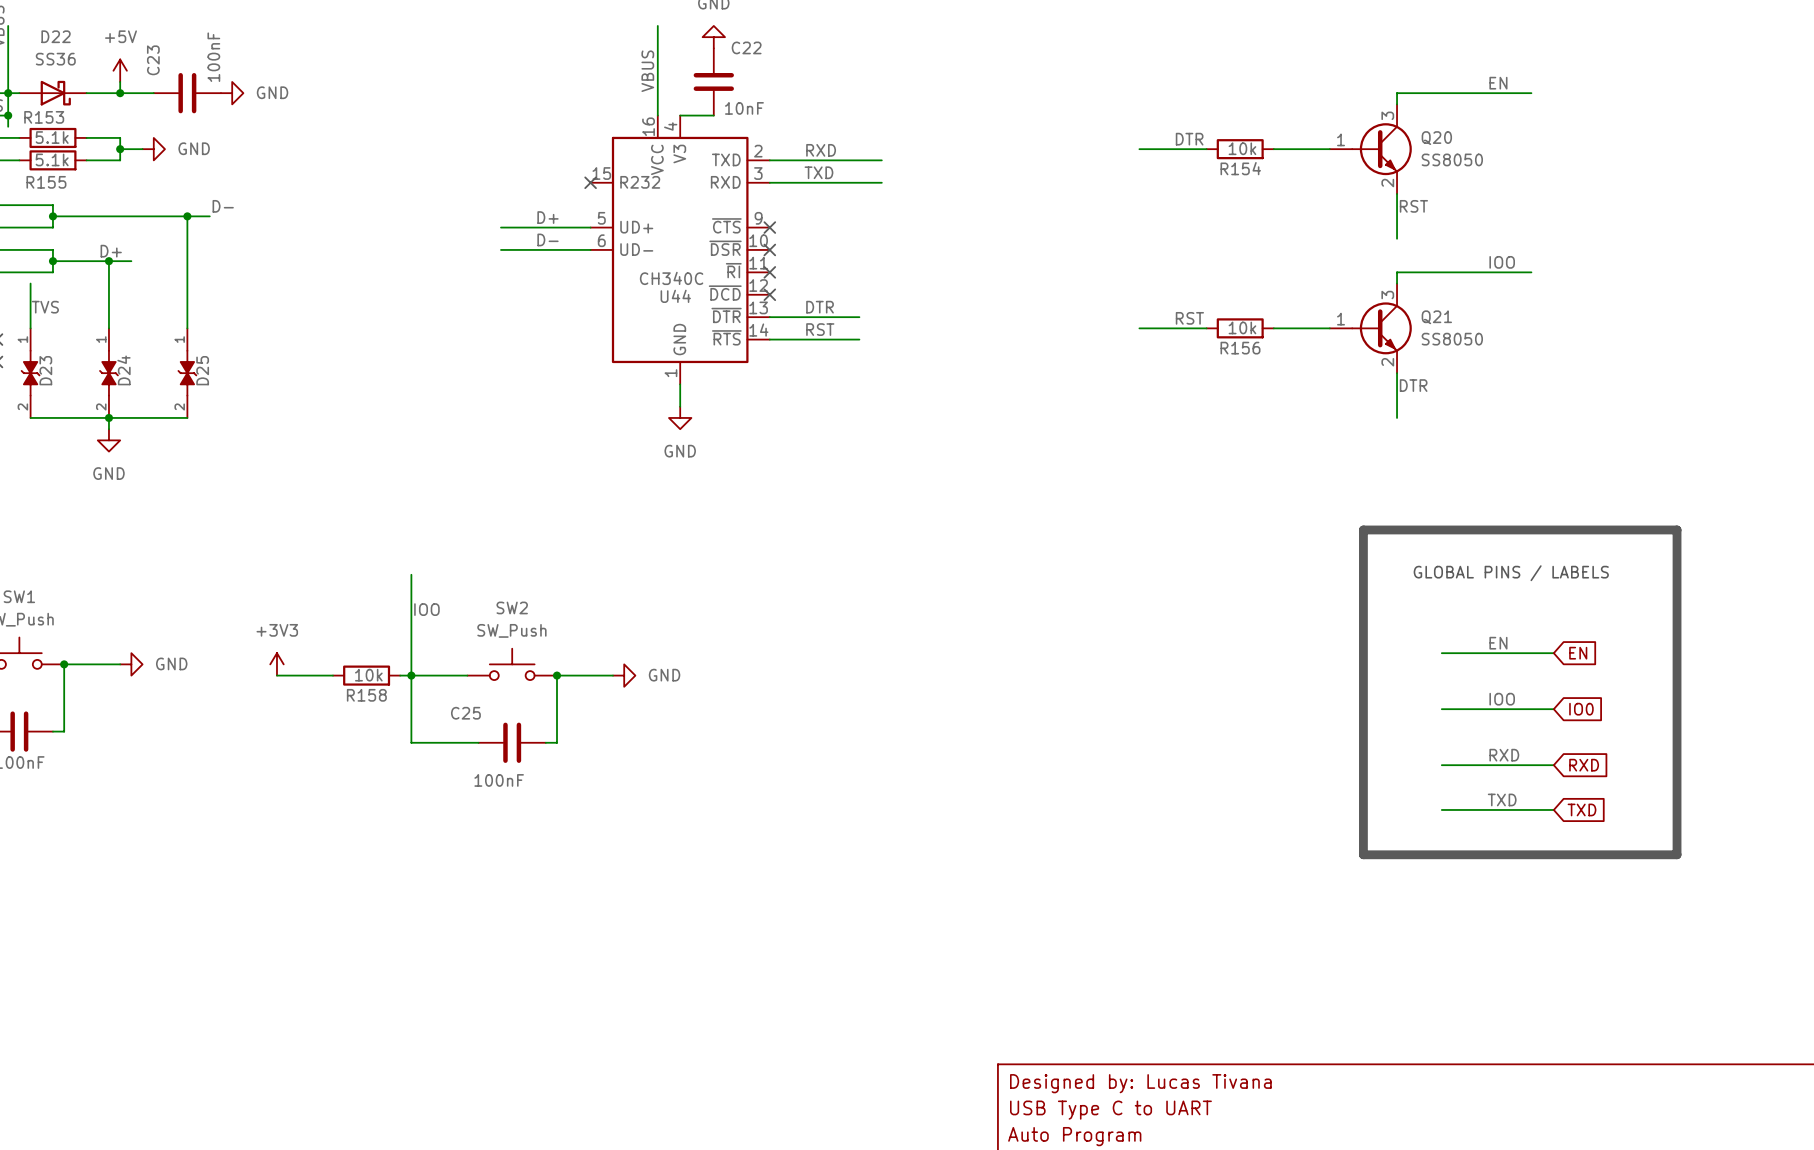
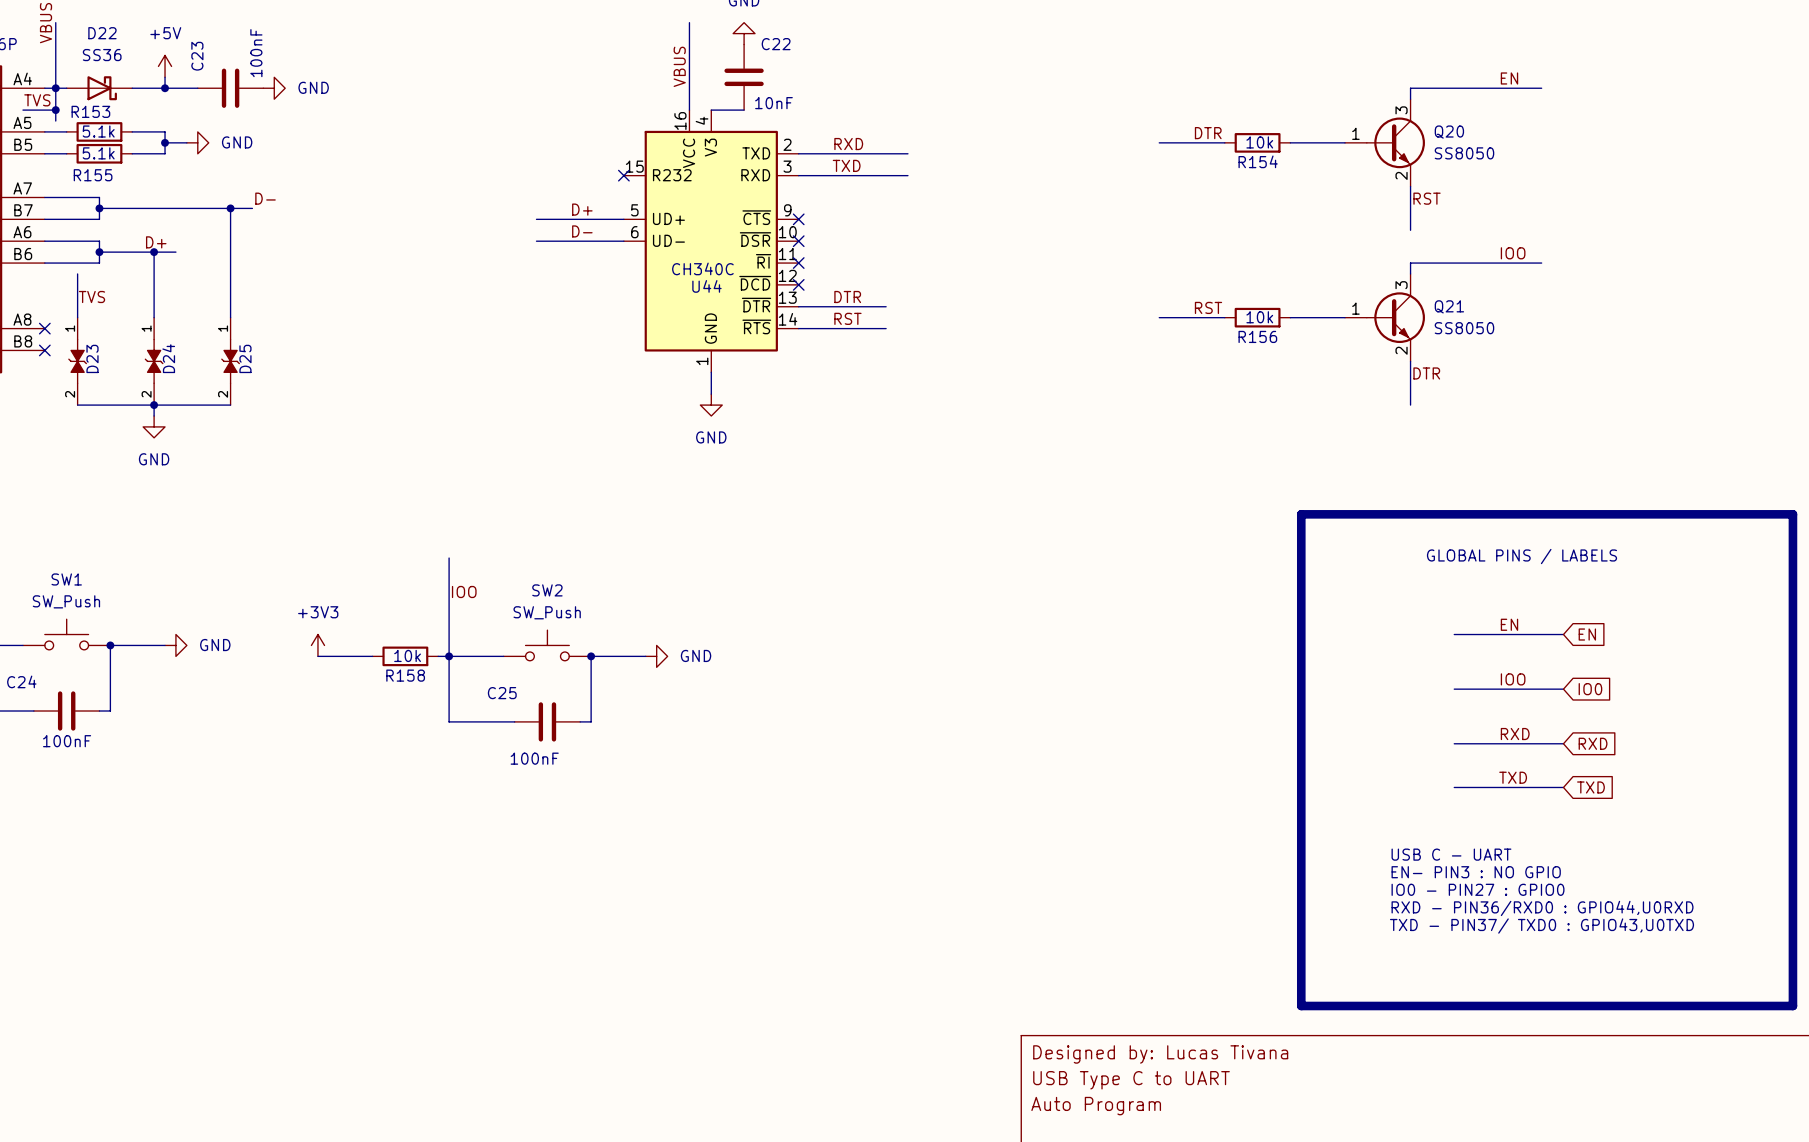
line: (1363, 529) (1363, 854) (1677, 854) (1677, 529) -> (1377, 514) (1301, 514) (1301, 1005) (1792, 1005) (1792, 514) (1683, 514)
text: none -> USB C - UART (1451, 854)
text: none -> EN- PIN3 : NO GPIO (1476, 872)
text: none -> IO0 - PIN27 : GPIO0 (1478, 889)
text: none -> RXD - PIN36/RXD0 : GPIO44,U0RXD (1542, 908)
text: none -> TXD - PIN37/ TXD0 : GPIO43,U0TXD (1542, 926)

